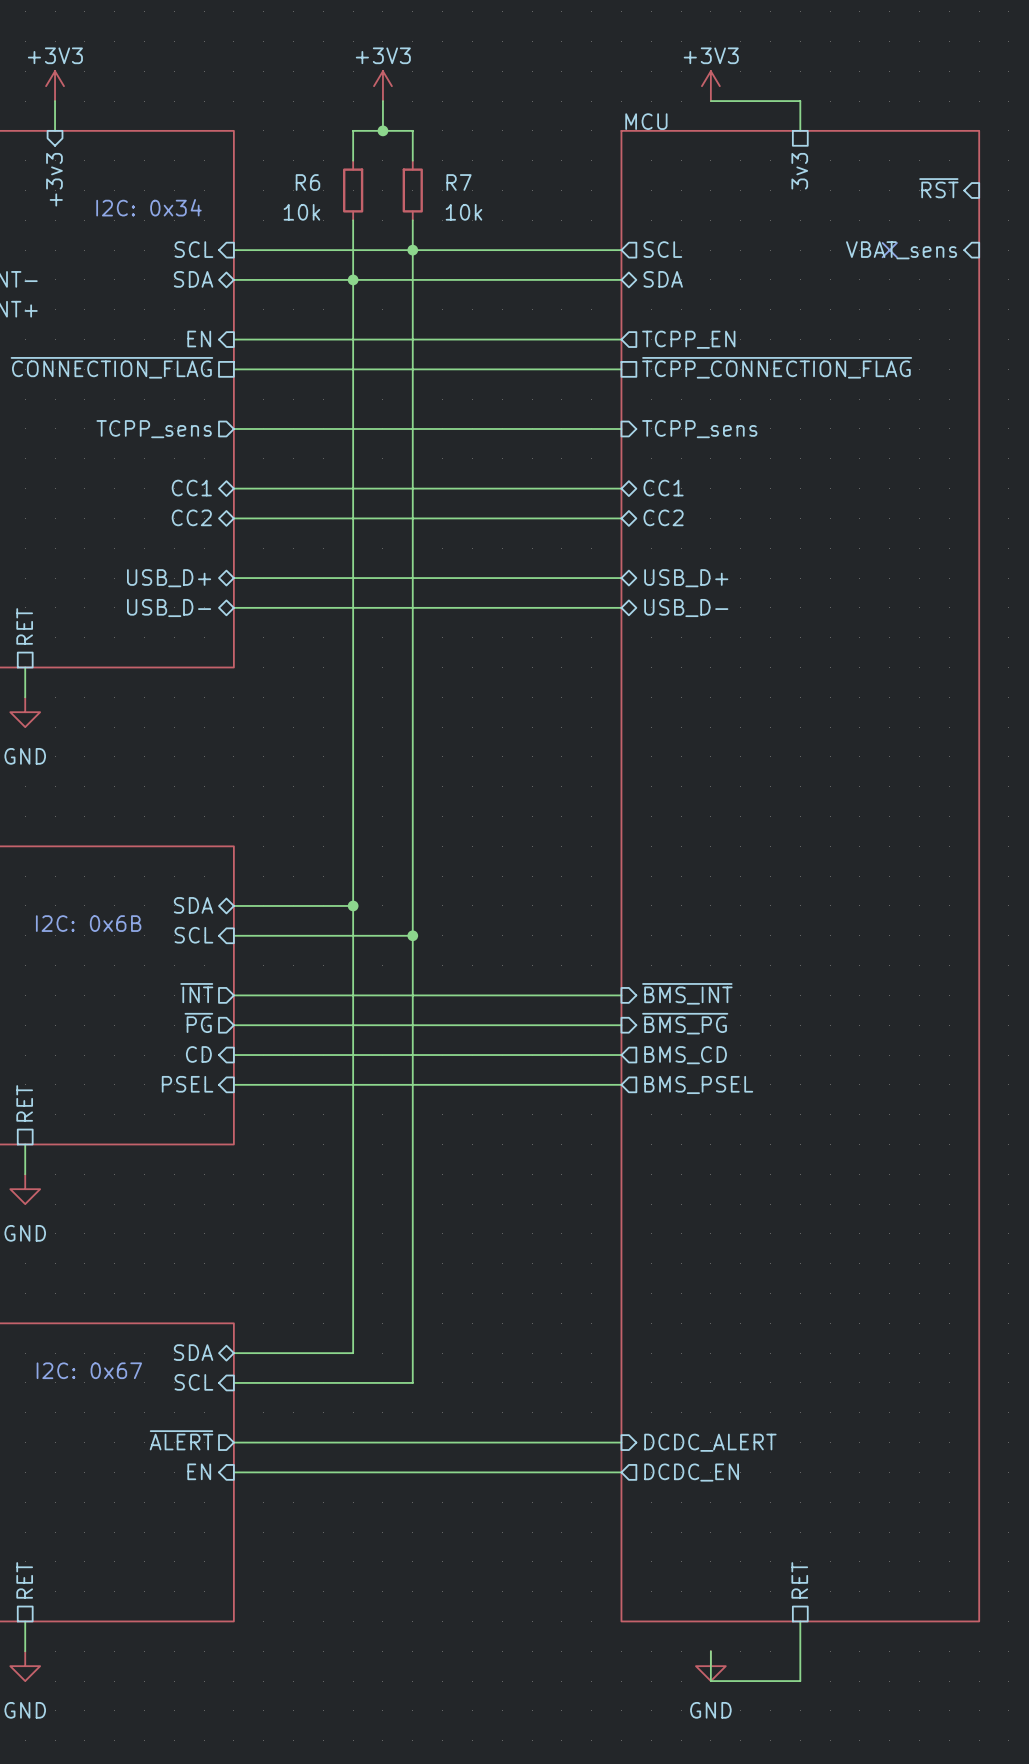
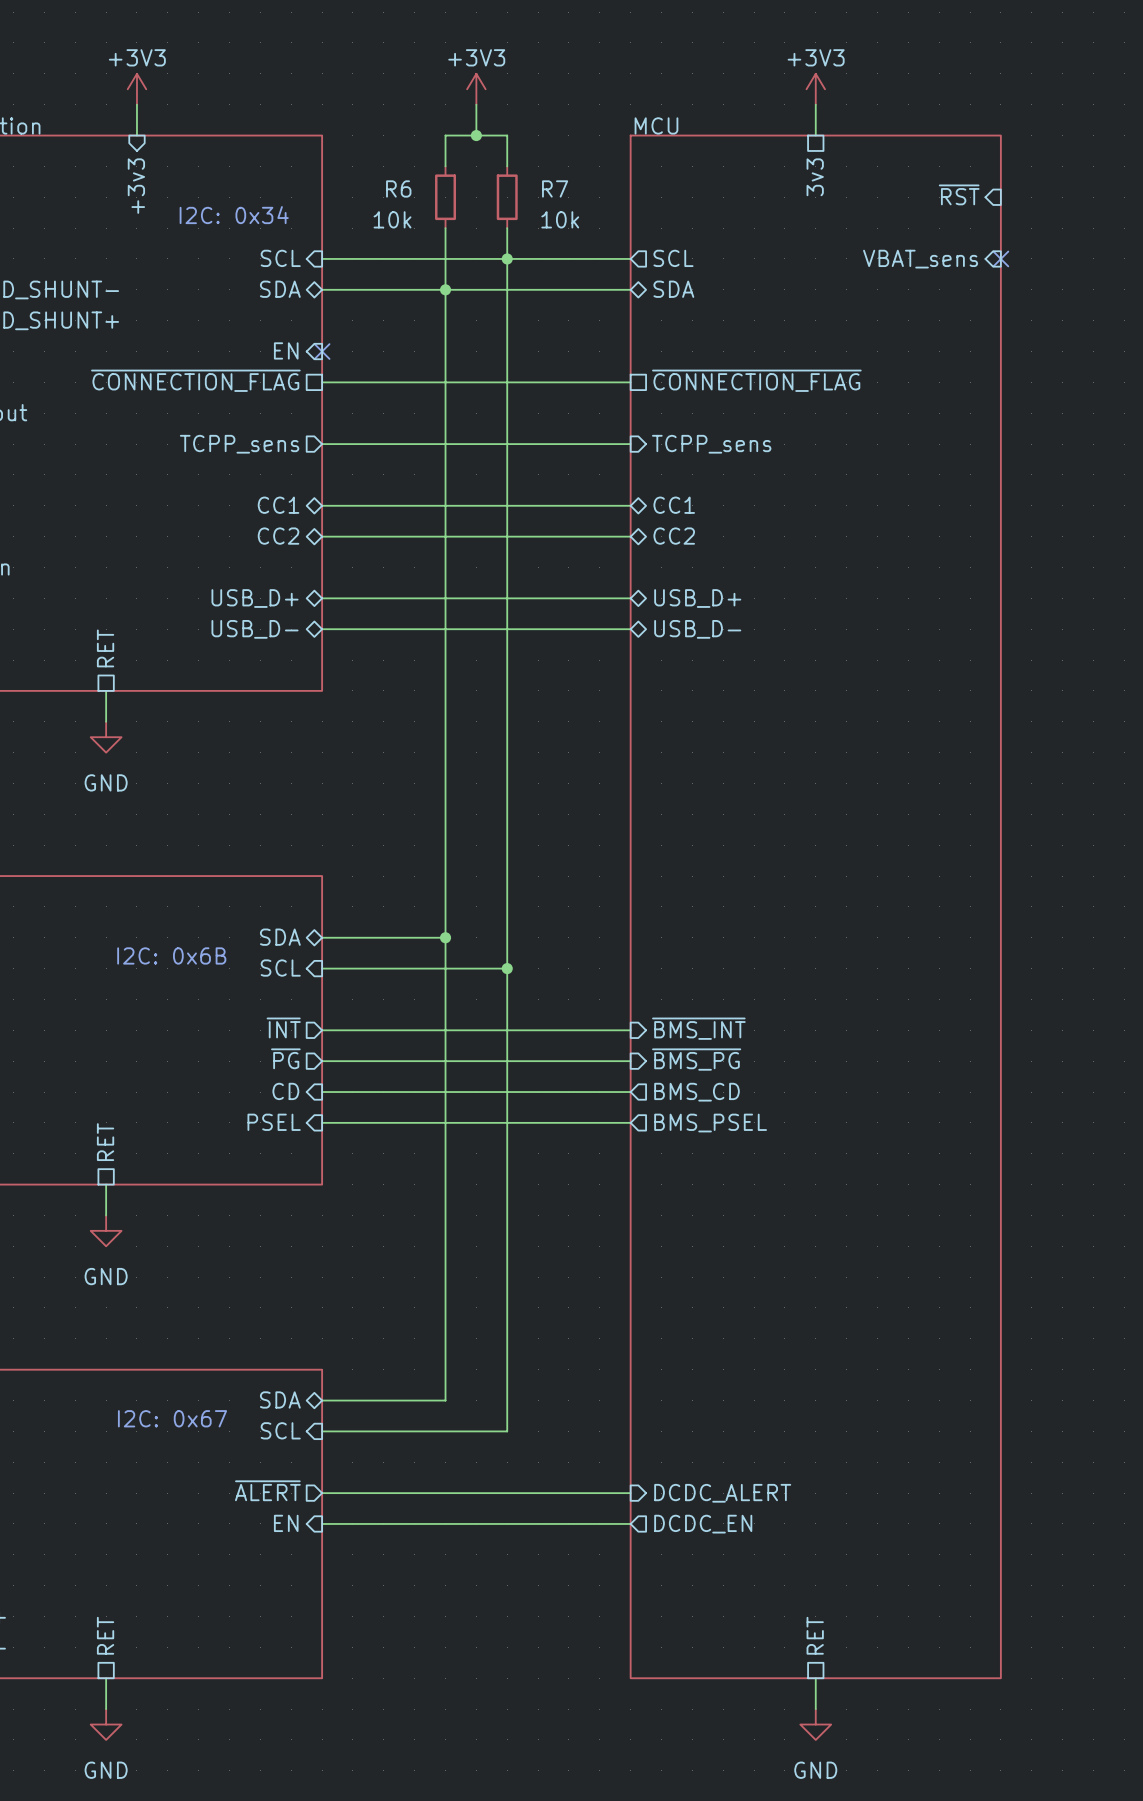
wire: (710, 101) (800, 101) (800, 130) -> (815, 104) (815, 135)
sheet pin position: 3v3 (799, 171) -> 3v3 (815, 177)
sheet pin position: ~{RST} (938, 188) -> ~{RST} (959, 194)
sheet pin position: SCL (662, 249) -> SCL (673, 258)
wire: (532, 250) (621, 250) -> none
sheet pin position: VBAT_sens (901, 250) -> VBAT_sens (920, 259)
wire: (532, 279) (621, 279) -> none
sheet pin position: SDA (663, 279) -> SDA (673, 289)
wire: (233, 339) (621, 339) -> none
no-connect mark: none -> (322, 351)
sheet pin: TCPP_EN (688, 339) -> none
sheet pin: ~{TCPP_CONNECTION_FLAG} (777, 367) -> ~{CONNECTION_FLAG} (756, 380)
wire: (532, 369) (621, 369) -> none
wire: (532, 428) (621, 428) -> none
sheet pin position: TCPP_sens (699, 429) -> TCPP_sens (711, 444)
wire: (532, 488) (621, 488) -> none
sheet pin position: CC1 (663, 488) -> CC1 (674, 505)
sheet pin position: CC2 (663, 517) -> CC2 (674, 536)
wire: (532, 518) (621, 518) -> none
wire: (532, 578) (621, 578) -> none
sheet pin position: USB_D+ (686, 578) -> USB_D+ (697, 598)
wire: (532, 607) (621, 607) -> none
sheet pin position: USB_D- (686, 608) -> USB_D- (697, 629)
sheet MCU position: (800, 876) -> (815, 906)
sheet pin position: ~{BMS_INT} (687, 993) -> ~{BMS_INT} (698, 1028)
wire: (532, 995) (621, 995) -> none
sheet pin position: ~{BMS_PG} (685, 1023) -> ~{BMS_PG} (696, 1059)
wire: (532, 1025) (621, 1025) -> none
wire: (532, 1055) (621, 1055) -> none
sheet pin position: BMS_CD (685, 1055) -> BMS_CD (697, 1092)
wire: (532, 1084) (621, 1084) -> none
sheet pin position: BMS_PSEL (698, 1084) -> BMS_PSEL (710, 1123)
wire: (532, 1442) (621, 1442) -> none
sheet pin position: DCDC_ALERT (710, 1442) -> DCDC_ALERT (722, 1493)
wire: (532, 1472) (621, 1472) -> none
sheet pin position: DCDC_EN (691, 1472) -> DCDC_EN (703, 1524)
sheet pin position: RET (799, 1580) -> RET (815, 1635)
wire: (800, 1621) (800, 1681) (710, 1681) (710, 1651) -> (815, 1678) (815, 1709)

